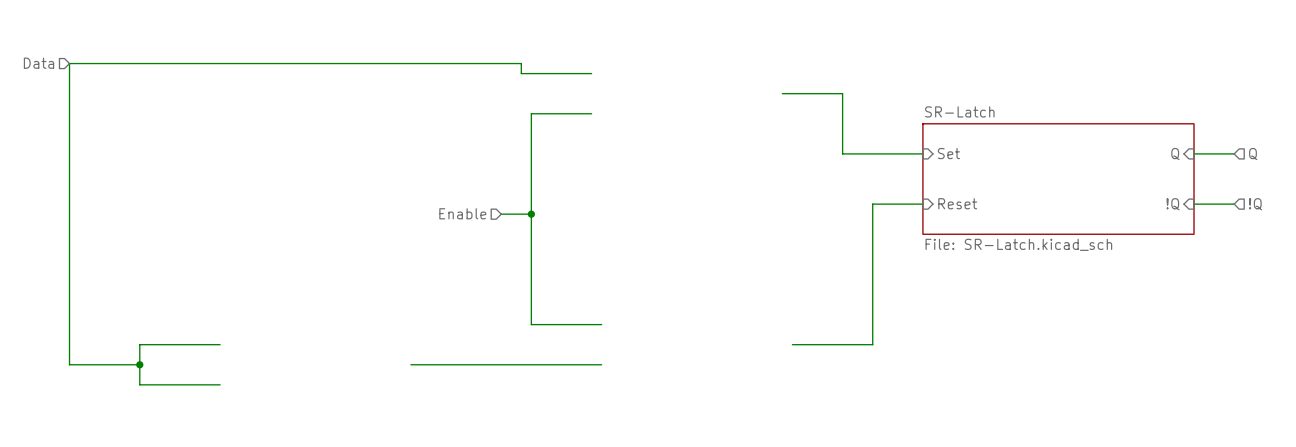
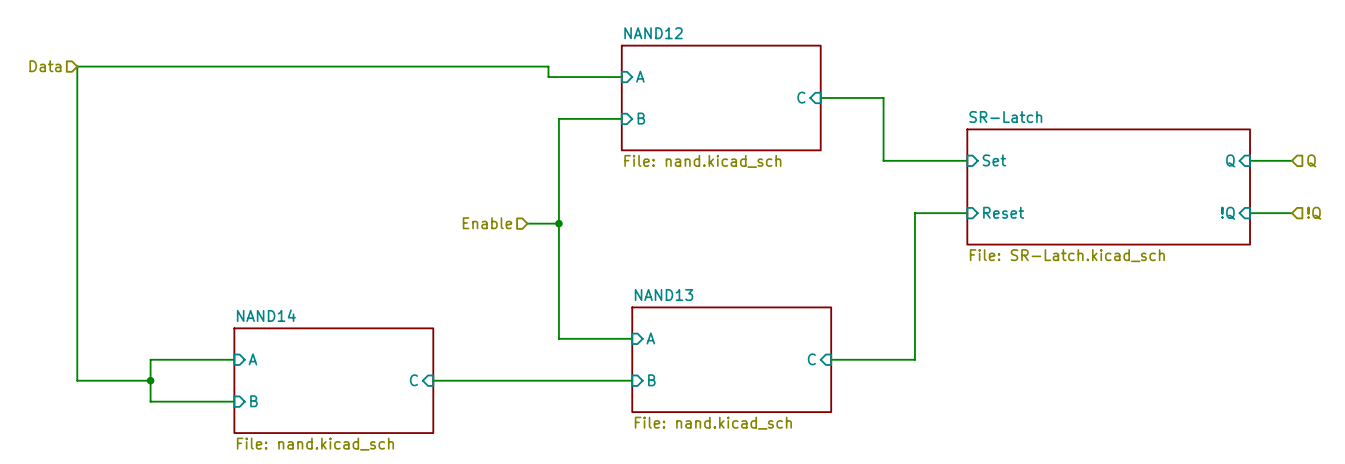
sheet pin: none -> A (640, 76)
sheet NAND12: none -> File: nand.kicad_sch (721, 97)
sheet pin: none -> C (801, 97)
sheet pin: none -> B (641, 118)
sheet pin: none -> A (650, 338)
sheet pin: none -> A (252, 359)
sheet NAND13: none -> File: nand.kicad_sch (731, 359)
sheet pin: none -> C (811, 359)
sheet NAND14: none -> File: nand.kicad_sch (333, 380)
sheet pin: none -> C (413, 380)
sheet pin: none -> B (651, 380)
sheet pin: none -> B (253, 401)

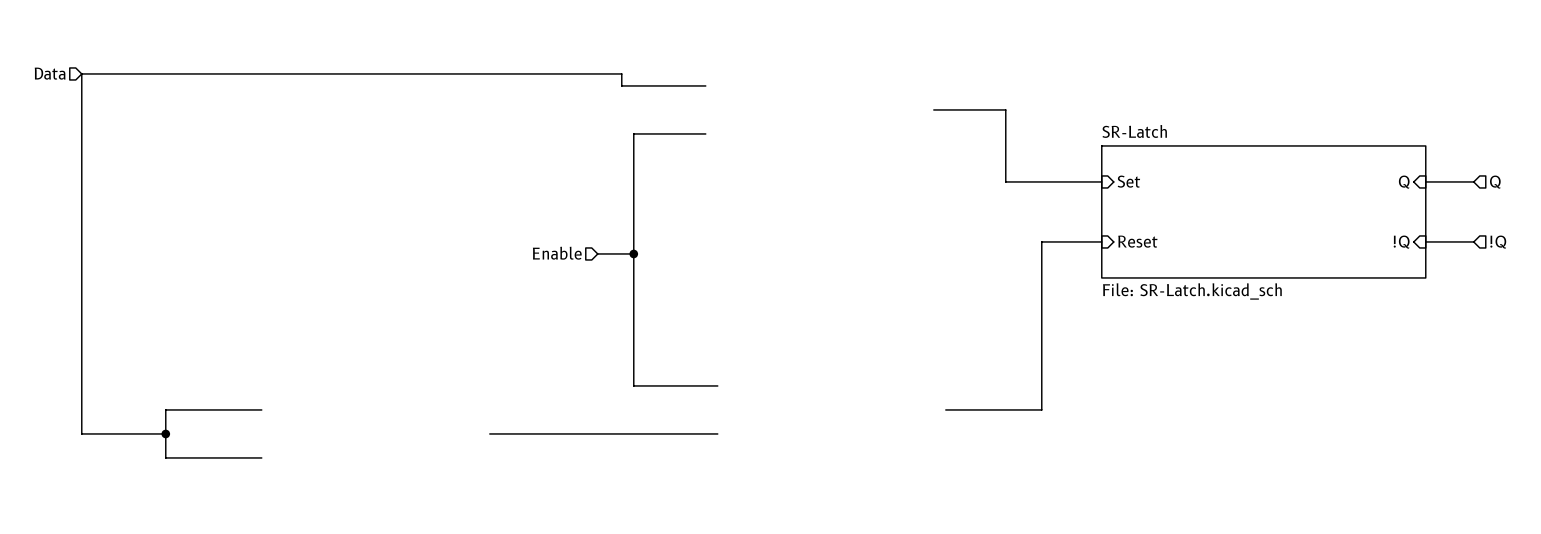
sheet pin: A (640, 76) -> none
sheet NAND12: File: nand.kicad_sch (721, 97) -> none
sheet pin: C (801, 97) -> none
sheet pin: B (641, 118) -> none
sheet pin: A (650, 338) -> none
sheet pin: A (252, 359) -> none
sheet NAND13: File: nand.kicad_sch (731, 359) -> none
sheet pin: C (811, 359) -> none
sheet NAND14: File: nand.kicad_sch (333, 380) -> none
sheet pin: C (413, 380) -> none
sheet pin: B (651, 380) -> none
sheet pin: B (253, 401) -> none

